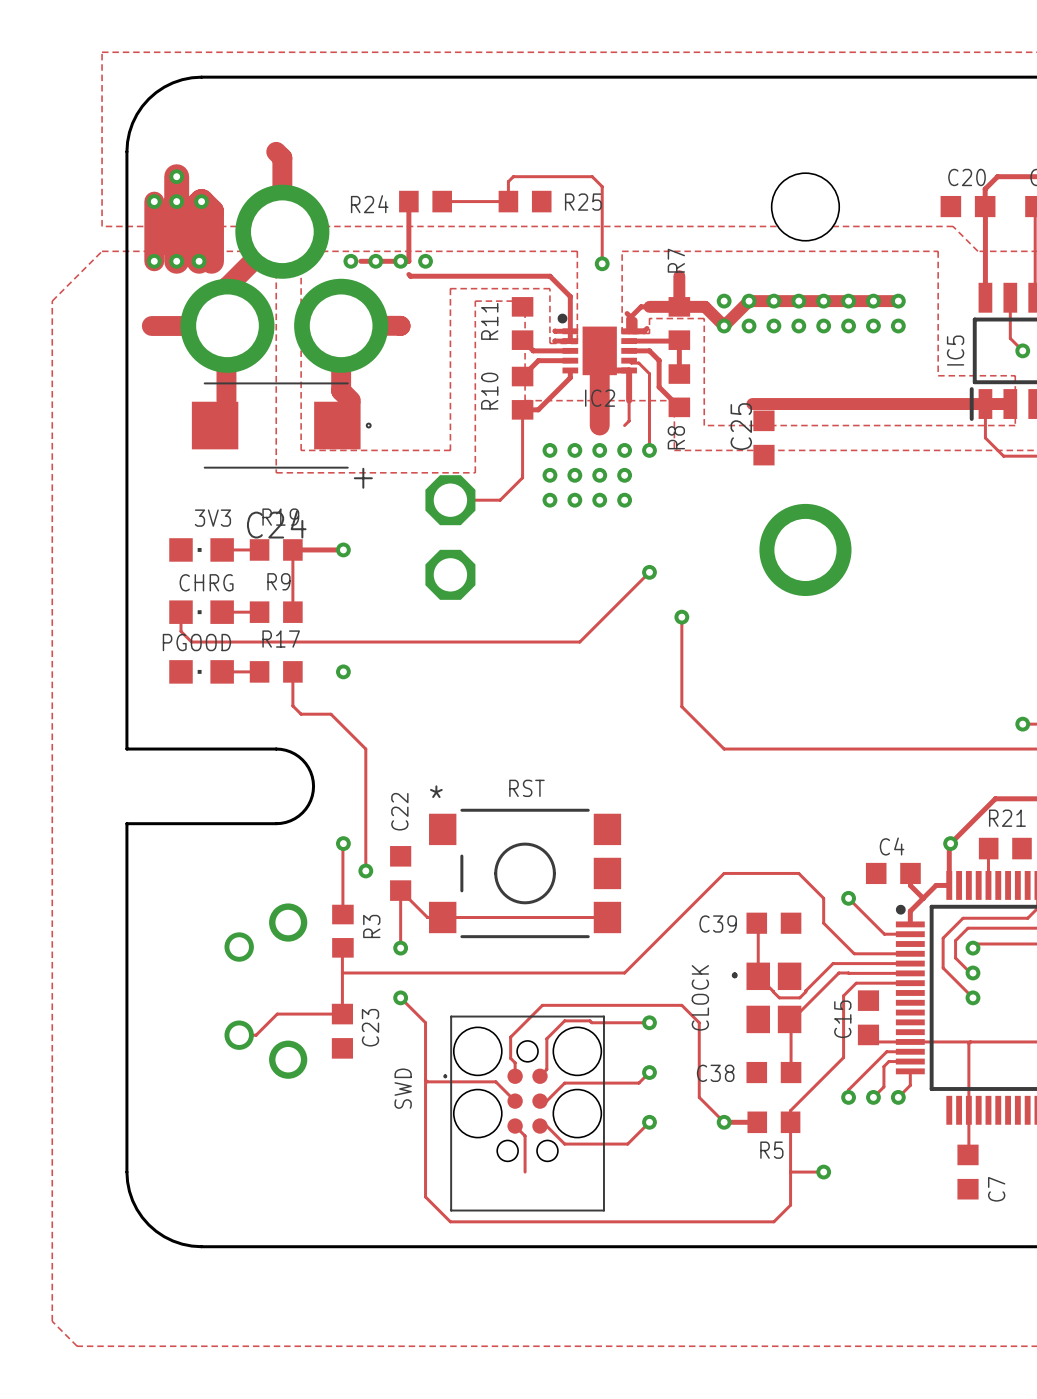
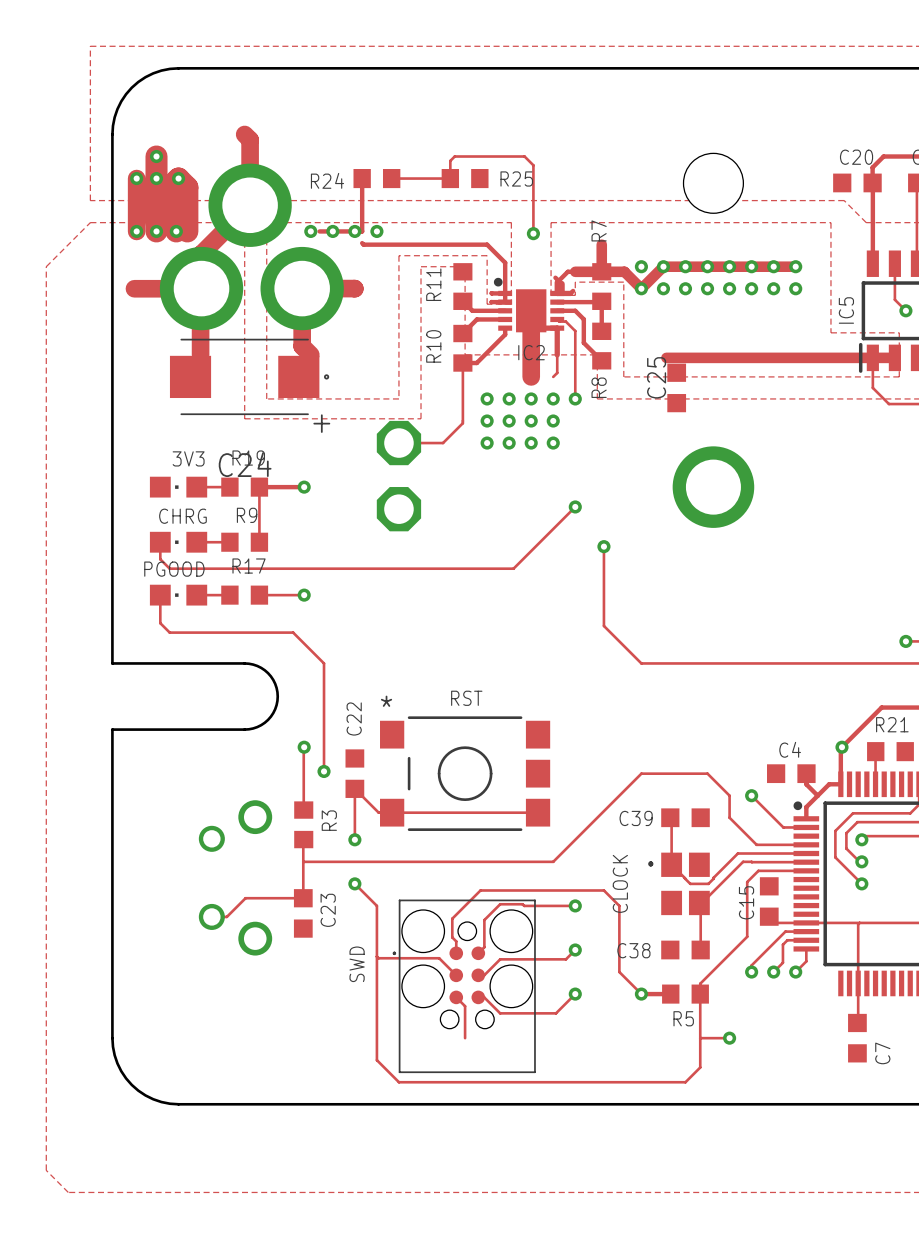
track: none -> (160, 595) (160, 623) (169, 632) (266, 632)
track: (292, 671) (292, 705) (301, 714) -> (259, 595) (304, 595)

